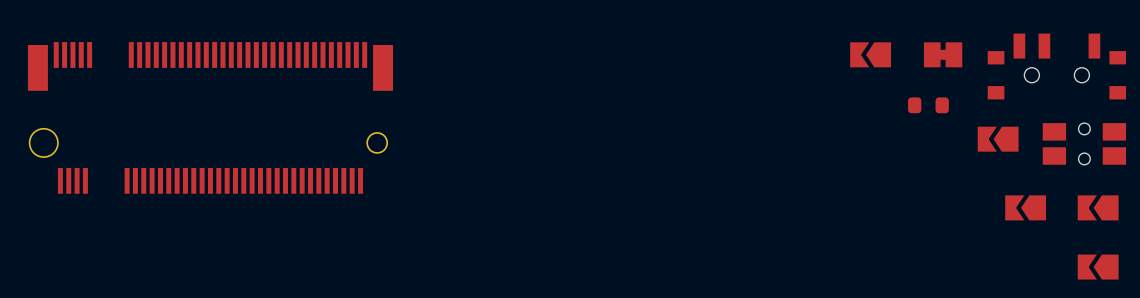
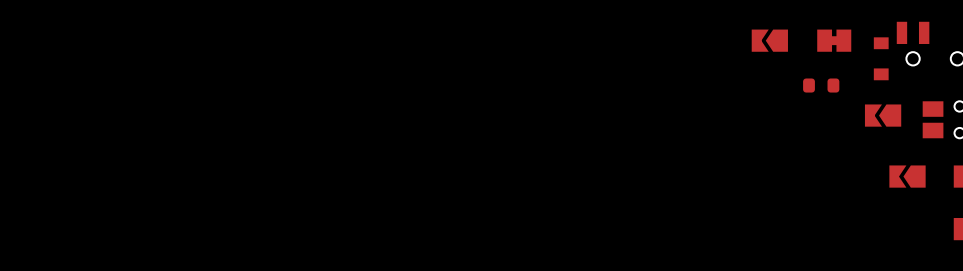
part: (210, 117) -> none

